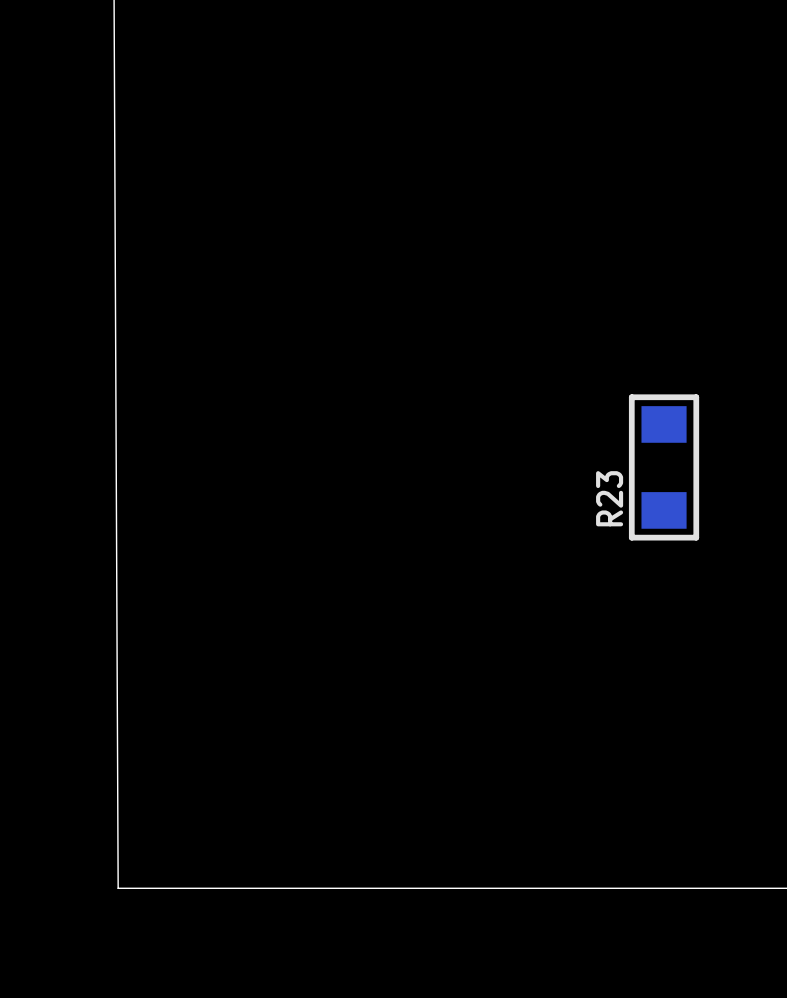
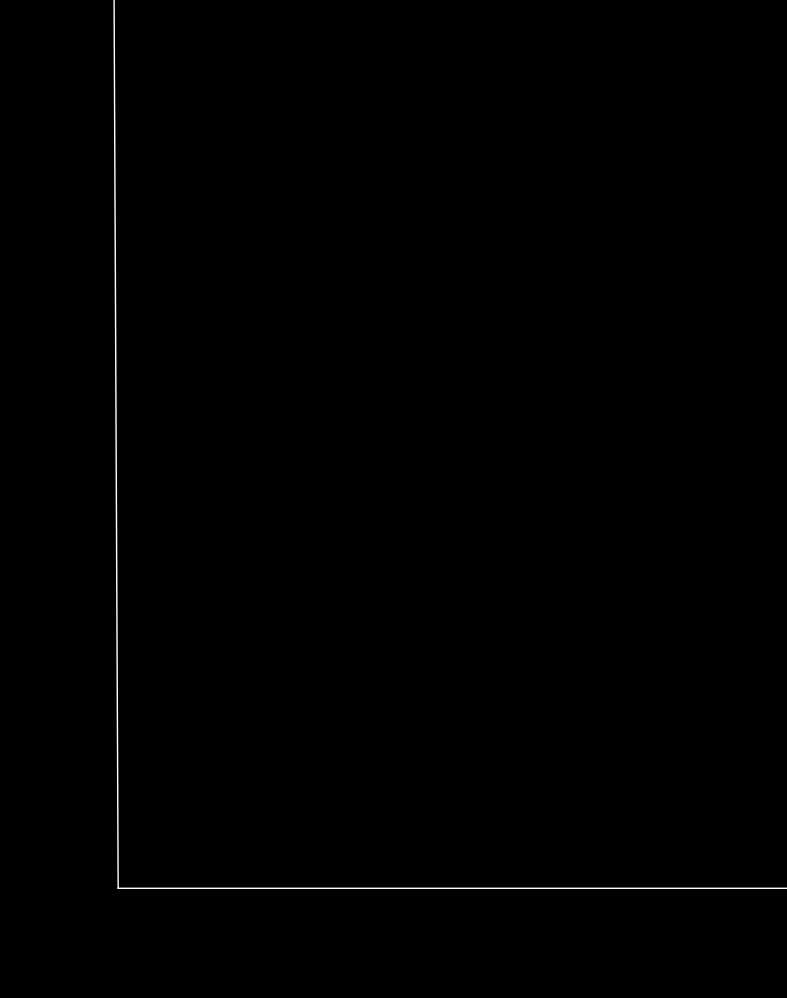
R23: (664, 467) -> none

